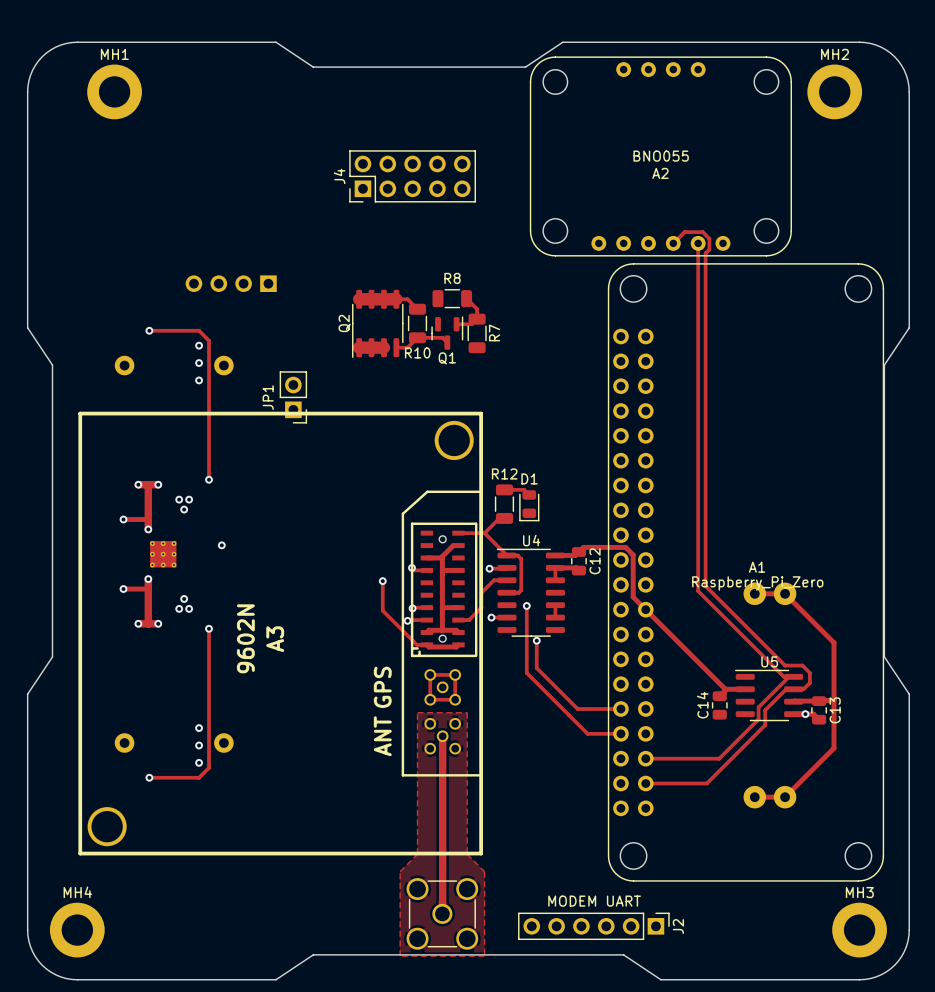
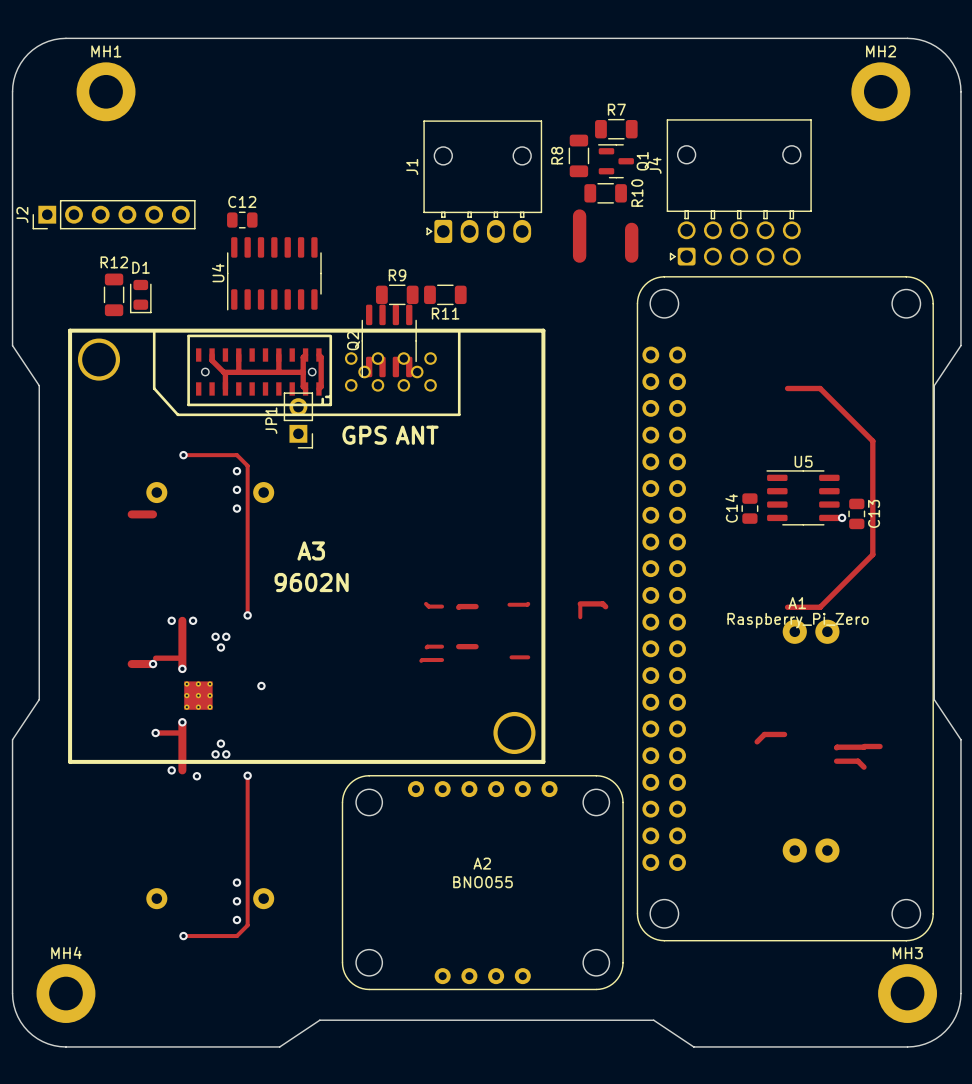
board edge: (275, 42) (313, 67) (525, 67) (562, 42) -> (279, 38) (588, 38)
J4 footprint: [349, 150, 476, 203] -> [666, 119, 812, 266]
A2 rotation: 0° (660, 156) -> 180° (482, 882)
A2 position: (660, 156) -> (482, 882)
J1: none -> (482, 181)
J4 name position: J4 (339, 176) -> J4 (655, 165)
track: none -> (579, 216) (579, 256)
track: none -> (631, 229) (631, 256)
track: (673, 243) (684, 232) (702, 232) (709, 238) (709, 249) (705, 253) (705, 586) (785, 665) (802, 665) (809, 673) (809, 682) (803, 689) (786, 689) (765, 710) (765, 725) (706, 783) (645, 783) -> none
track: (698, 243) (698, 591) (783, 676) (793, 676) -> none
R8 name position: R8 (452, 278) -> R8 (557, 155)
R9: none -> (397, 294)
R11: none -> (445, 294)
part: (231, 283) -> none
R8 rotation: 0° (452, 298) -> 90° clockwise (578, 155)
R8 position: (452, 298) -> (578, 155)
track: (466, 298) (477, 309) (477, 319) (471, 324) (456, 324) -> none
track: (359, 299) (407, 299) (417, 309) -> none
R10 rotation: 0° (417, 323) -> 90° clockwise (605, 193)
R10 position: (417, 323) -> (605, 193)
track: (149, 330) (199, 330) (208, 340) (208, 479) -> (183, 455) (236, 455) (247, 465) (247, 615)
via: (149, 330) -> none
R7 name position: R7 (494, 332) -> R7 (616, 109)
Q1 rotation: 0° (447, 333) -> 90° counterclockwise (616, 161)
Q1 position: (447, 333) -> (616, 161)
R7 rotation: 0° (477, 333) -> 90° clockwise (616, 129)
R7 position: (477, 333) -> (616, 129)
track: none -> (212, 355) (212, 360) (225, 373) (225, 388)
track: none -> (238, 355) (239, 372)
track: none -> (278, 355) (278, 372)
track: none -> (305, 355) (303, 357) (303, 386) (305, 388)
track: none -> (318, 355) (321, 357) (321, 386) (318, 388)
track: (447, 342) (442, 337) (417, 337) (407, 347) (396, 347) -> none
via: (199, 345) -> none
track: (359, 347) (383, 347) -> none
track: none -> (223, 372) (303, 372)
R10 name position: R10 (417, 352) -> R10 (637, 193)
via: (199, 363) -> none
part: (124, 365) -> none
part: (223, 365) -> none
via: (199, 380) -> none
via: none -> (183, 455)
via: none -> (236, 471)
via: none -> (236, 489)
part: none -> (156, 492)
part: none -> (263, 492)
via: (208, 479) -> none
via: none -> (236, 508)
via: (138, 484) -> none
track: (148, 484) (148, 529) -> (182, 620) (182, 668)
via: (158, 484) -> none
via: none -> (842, 517)
track: (504, 489) (524, 489) (529, 494) -> none
via: (179, 499) -> none
via: (189, 499) -> none
R12 position: (504, 504) -> (114, 294)
D1 position: (529, 505) -> (140, 296)
via: (184, 509) -> none
track: (504, 518) (499, 518) (484, 533) -> none
track: (123, 519) (148, 519) -> (155, 658) (182, 658)
via: (123, 519) -> none
via: (148, 529) -> none
track: (458, 533) (484, 533) -> none
track: (484, 533) (507, 555) (517, 555) (521, 558) (521, 590) (518, 592) (507, 592) -> none
via: (221, 545) -> none
track: (458, 545) (453, 545) (440, 557) (426, 557) -> none
part position: (163, 554) -> (198, 695)
track: (555, 555) (575, 555) (583, 547) (625, 547) (633, 554) (633, 597) (726, 689) -> none
track: (442, 556) (441, 630) -> none
C12 rotation: 0° (578, 561) -> 90° clockwise (242, 220)
C12 position: (578, 561) -> (242, 220)
C12 name position: C12 (595, 561) -> C12 (242, 201)
via: (412, 567) -> none
via: (489, 568) -> none
via: none -> (247, 615)
track: (148, 579) (148, 623) -> (182, 722) (182, 770)
via: (148, 579) -> none
track: (507, 580) (493, 580) (481, 592) (481, 607) (469, 620) (458, 620) -> none
track: (382, 581) (382, 610) (416, 644) (426, 644) (429, 647) (456, 647) (458, 644) -> none
via: (382, 581) -> none
via: none -> (171, 620)
via: none -> (193, 620)
track: (123, 589) (148, 589) -> (155, 732) (182, 732)
via: (123, 589) -> none
U4 rotation: 0° (530, 592) -> 90° counterclockwise (274, 273)
U4 position: (530, 592) -> (274, 273)
track: (754, 593) (785, 593) (834, 642) (834, 748) (785, 797) (754, 797) -> (787, 388) (820, 388) (872, 441) (872, 554) (820, 607) (787, 607)
via: (184, 598) -> none
via: none -> (215, 636)
via: none -> (226, 636)
track: (526, 605) (526, 673) (587, 733) (620, 733) -> none
via: (526, 605) -> none
track: (555, 605) (555, 617) -> none
via: (179, 608) -> none
via: (189, 608) -> none
via: none -> (220, 647)
via: (412, 608) -> none
via: (491, 617) -> none
via: (407, 620) -> none
via: (138, 623) -> none
via: none -> (182, 668)
track: (208, 628) (208, 767) (199, 777) (149, 777) -> (247, 775) (247, 925) (236, 936) (183, 936)
via: (208, 628) -> none
track: (426, 632) (429, 630) (456, 630) (458, 632) -> none
A3 rotation: 0° (280, 633) -> 90° counterclockwise (306, 546)
track: (536, 640) (536, 668) (577, 709) (620, 709) -> none
via: (536, 640) -> none
via: none -> (261, 685)
track: (430, 674) (430, 699) (455, 699) (455, 674) (430, 674) -> none
track: (789, 676) (758, 707) (758, 719) (719, 758) (645, 758) -> none
via: none -> (182, 722)
via: none -> (155, 732)
U5 position: (769, 695) -> (803, 497)
via: none -> (220, 743)
C14 position: (719, 705) -> (749, 508)
via: none -> (215, 754)
via: none -> (226, 754)
C13 position: (819, 710) -> (856, 513)
zone outline: (417, 712) (417, 854) (400, 871) (400, 956) (484, 956) (484, 871) (467, 854) (467, 712) (417, 712) -> none
via: (805, 714) -> none
via: none -> (171, 770)
via: none -> (247, 775)
track: (442, 736) (442, 913) (442, 901) -> none
part: (124, 743) -> none
part: (223, 743) -> none
via: (199, 745) -> none
via: (199, 762) -> none
via: (149, 777) -> none
via: none -> (236, 882)
part: none -> (156, 898)
part: none -> (263, 898)
via: none -> (236, 901)
via: none -> (236, 920)
via: none -> (183, 936)
J2 value: MODEM UART (594, 901) -> none
part: (442, 913) -> none
J2 rotation: 0° (593, 926) -> 180° (114, 214)
J2 position: (593, 926) -> (114, 214)

